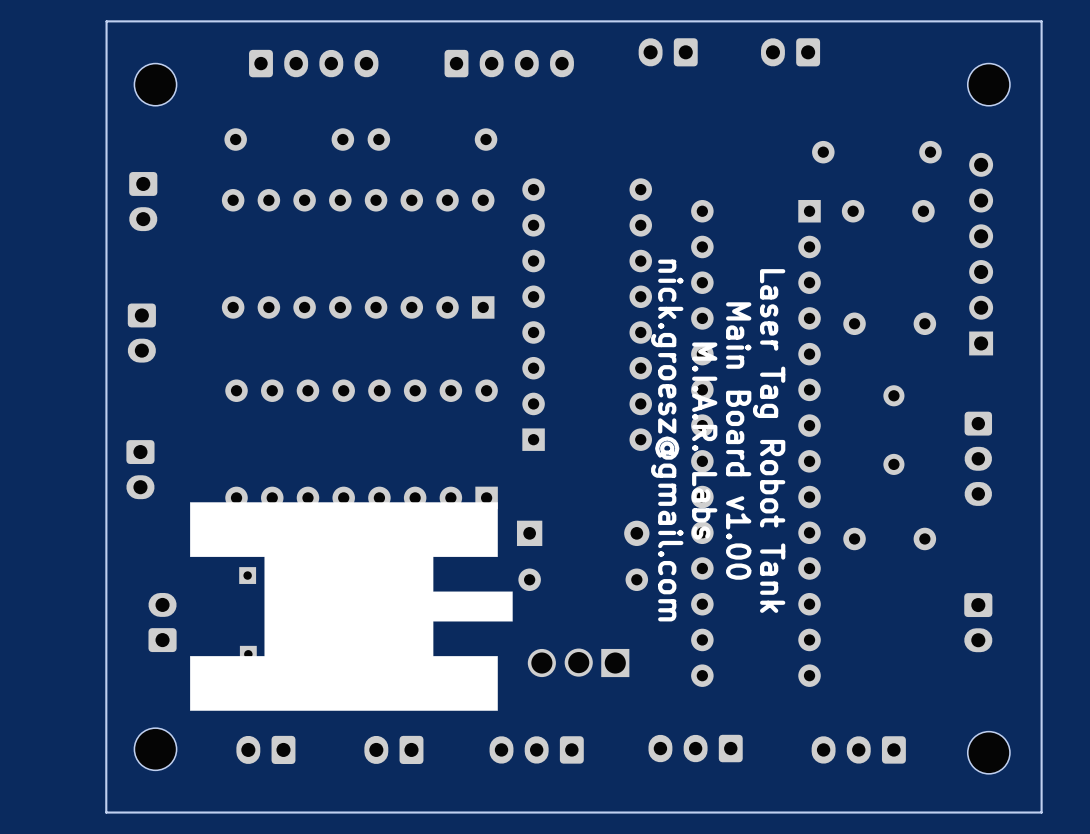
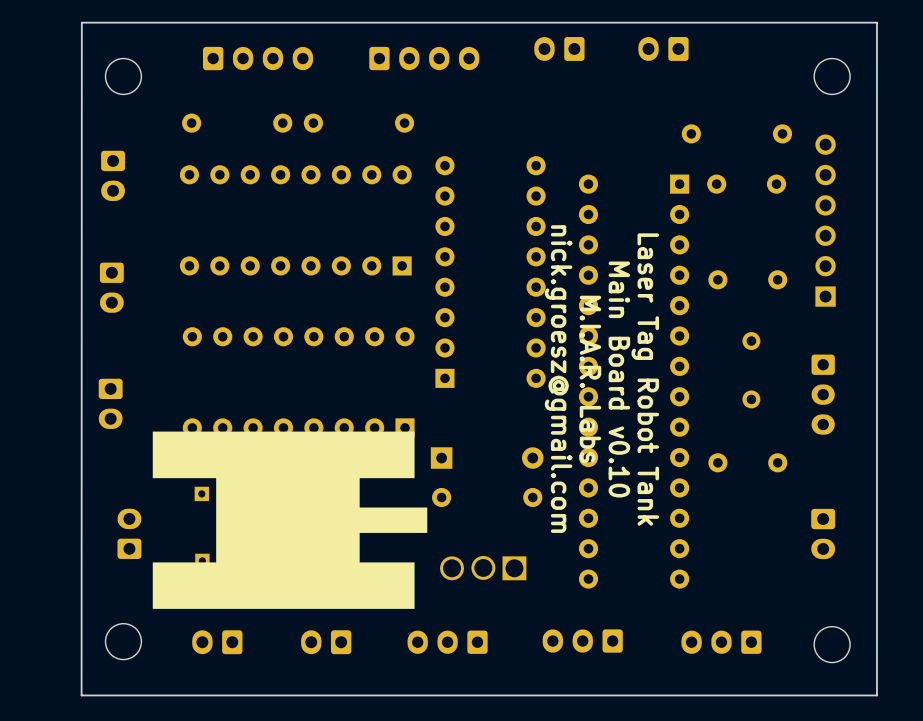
text: Main Board v1.00 (738, 441) -> Main Board v0.10 (619, 379)

